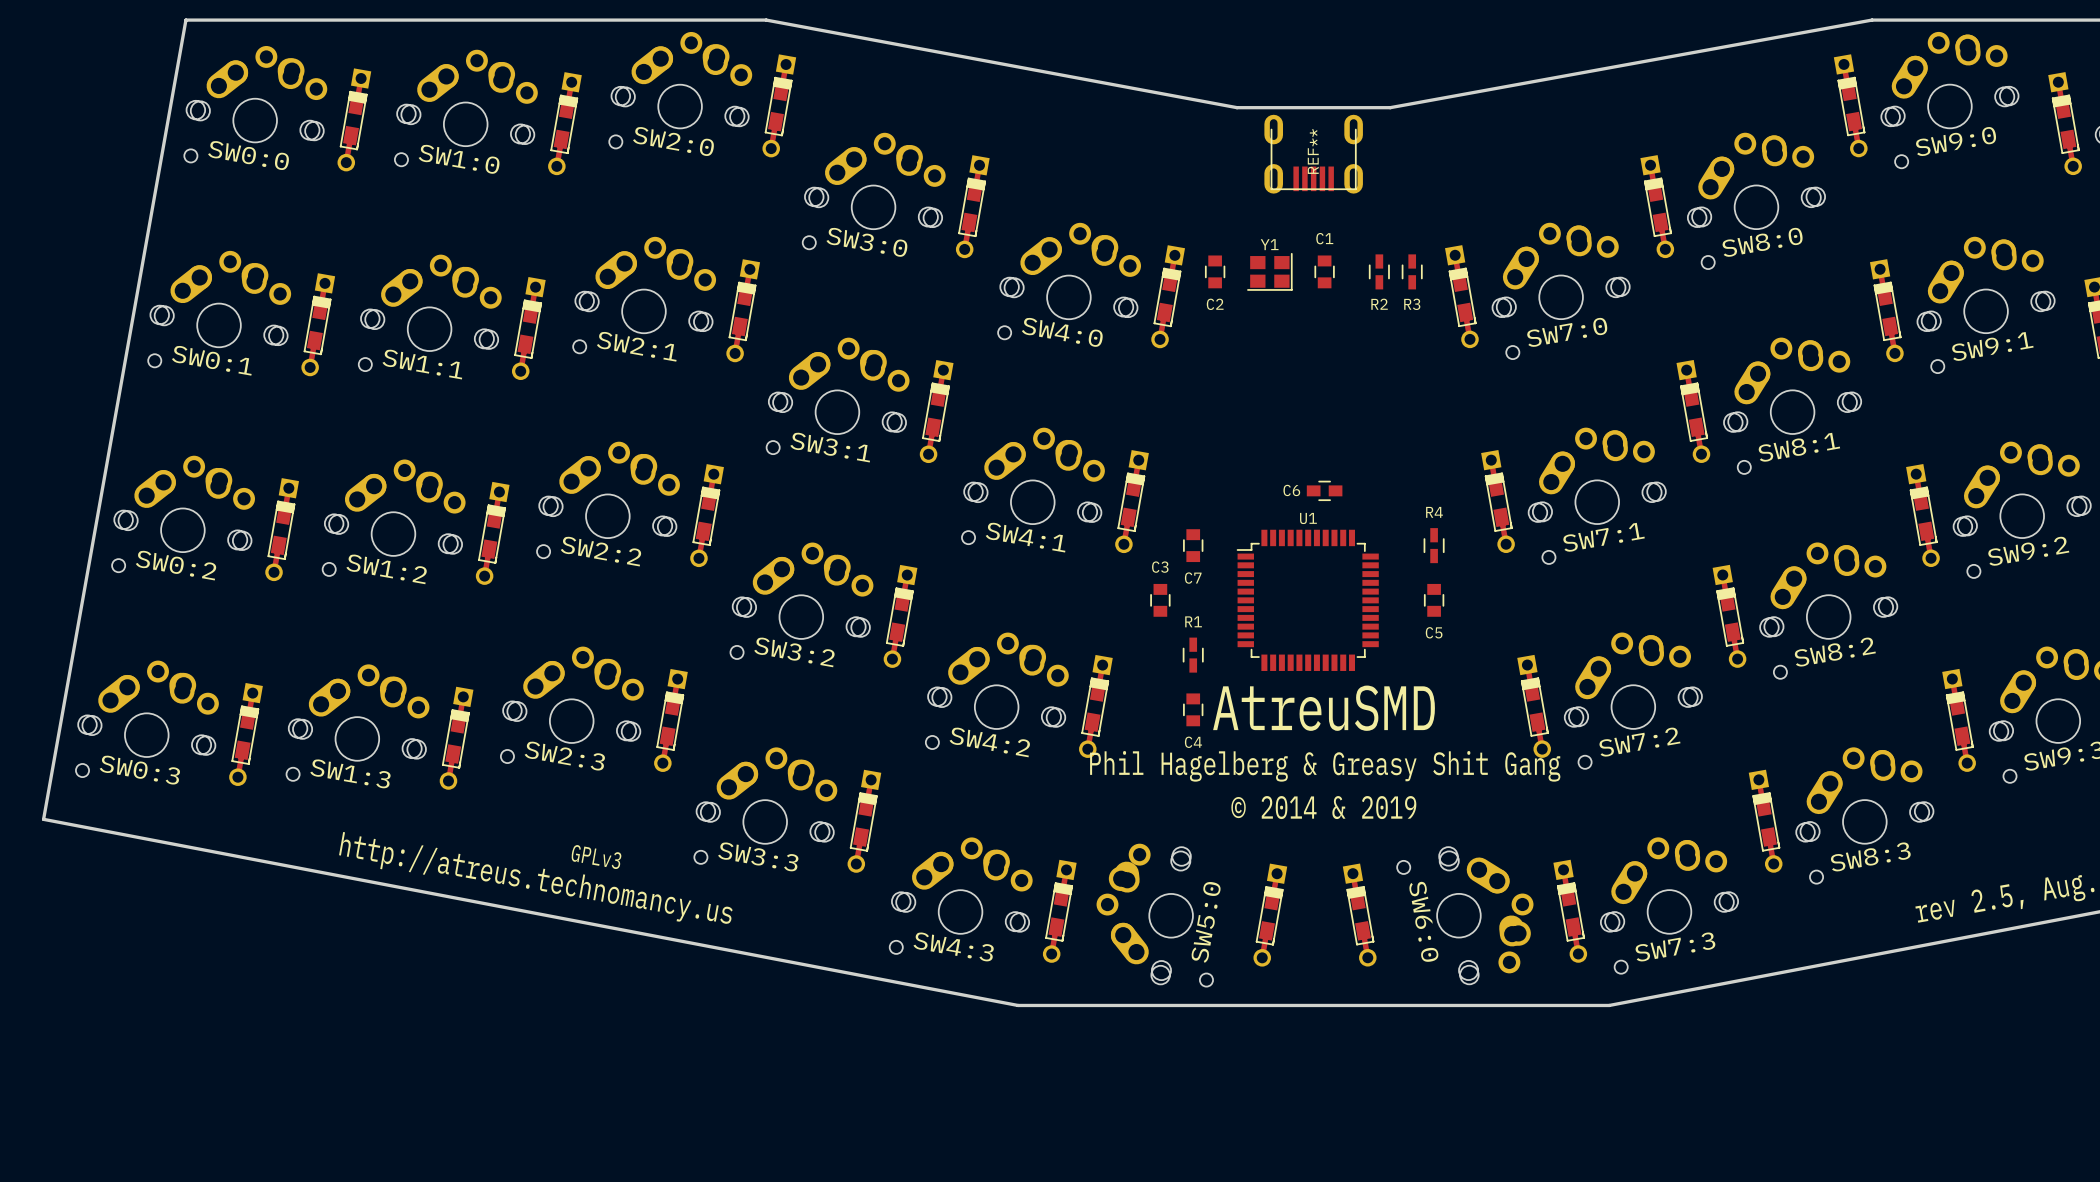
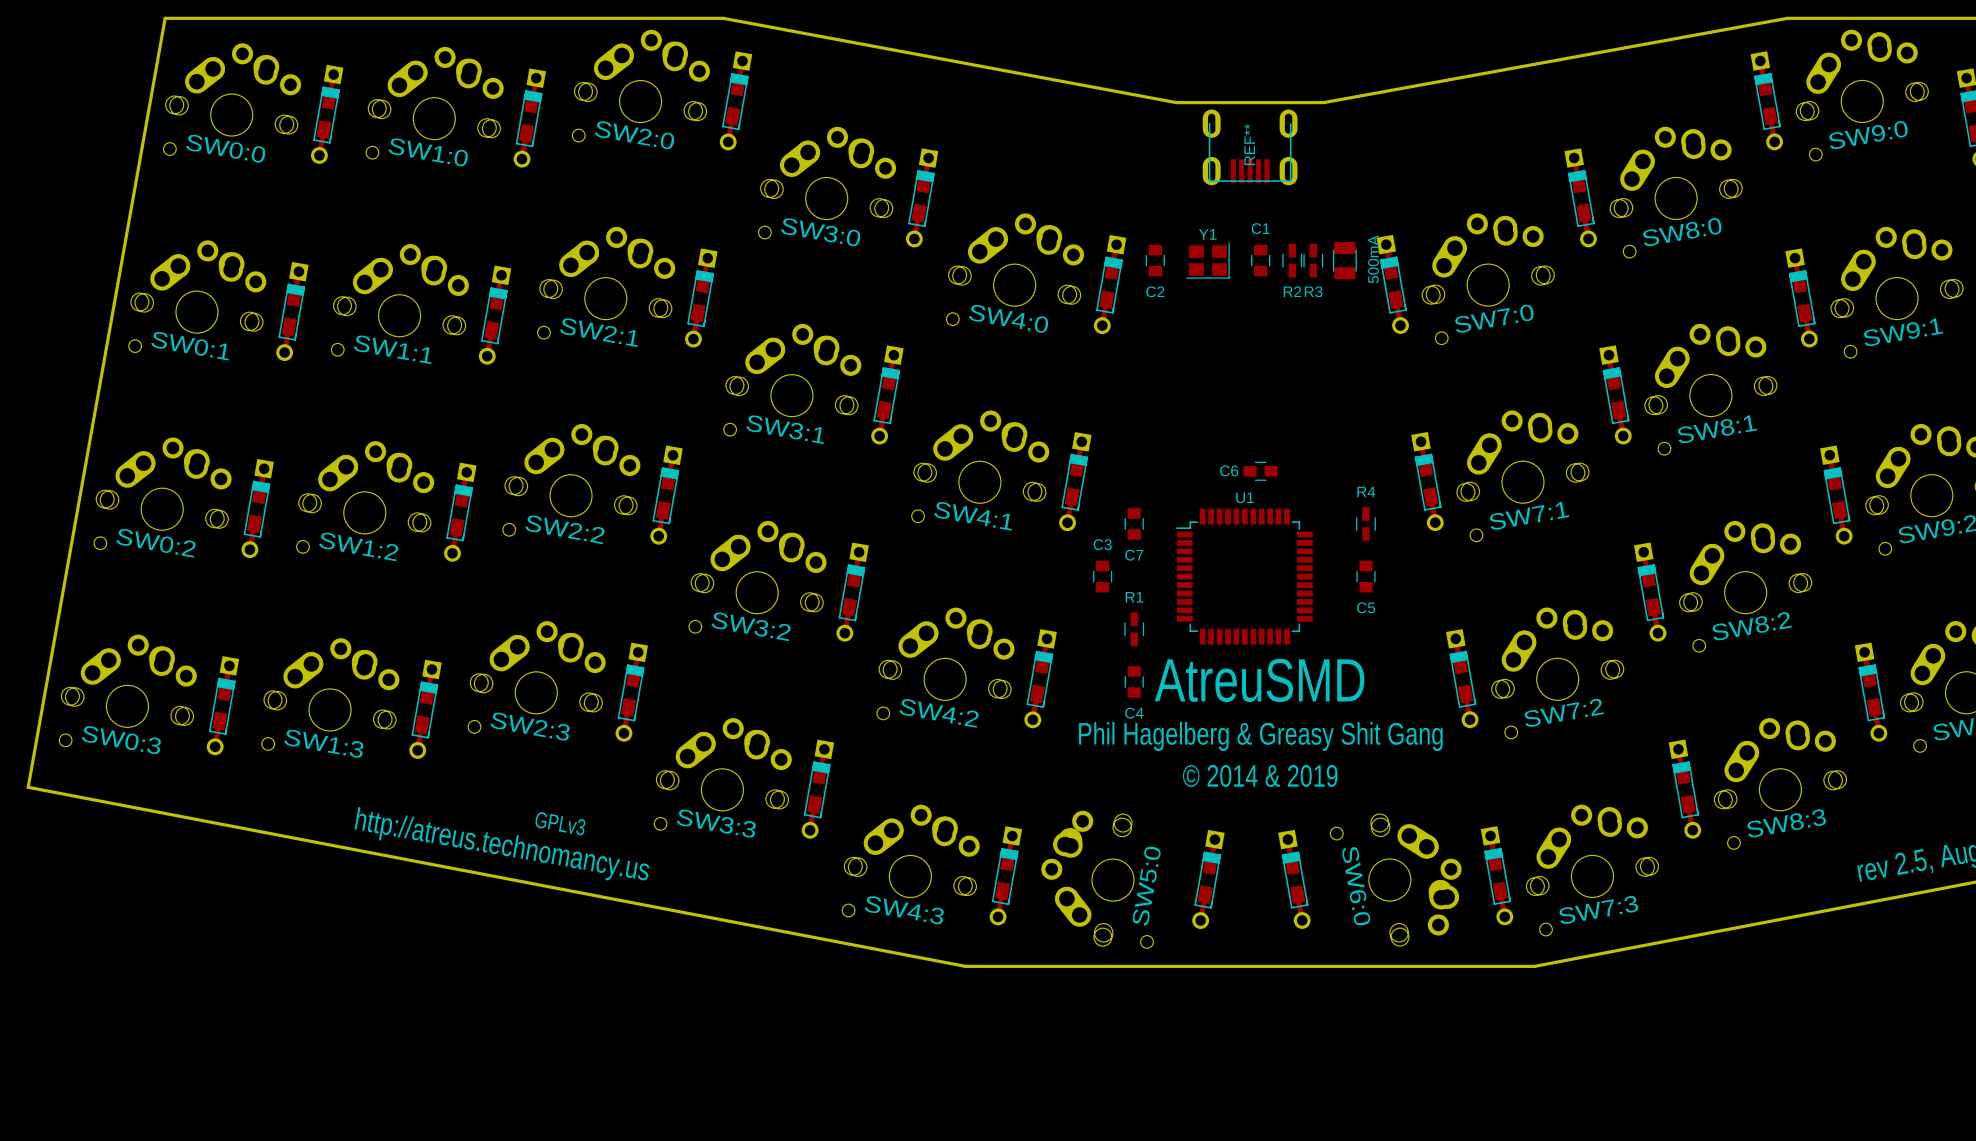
R2: none -> (1292, 260)
R3: (1412, 271) -> none
500mA: none -> (1344, 260)
R2 name: R2 (1379, 304) -> R3 (1313, 291)

